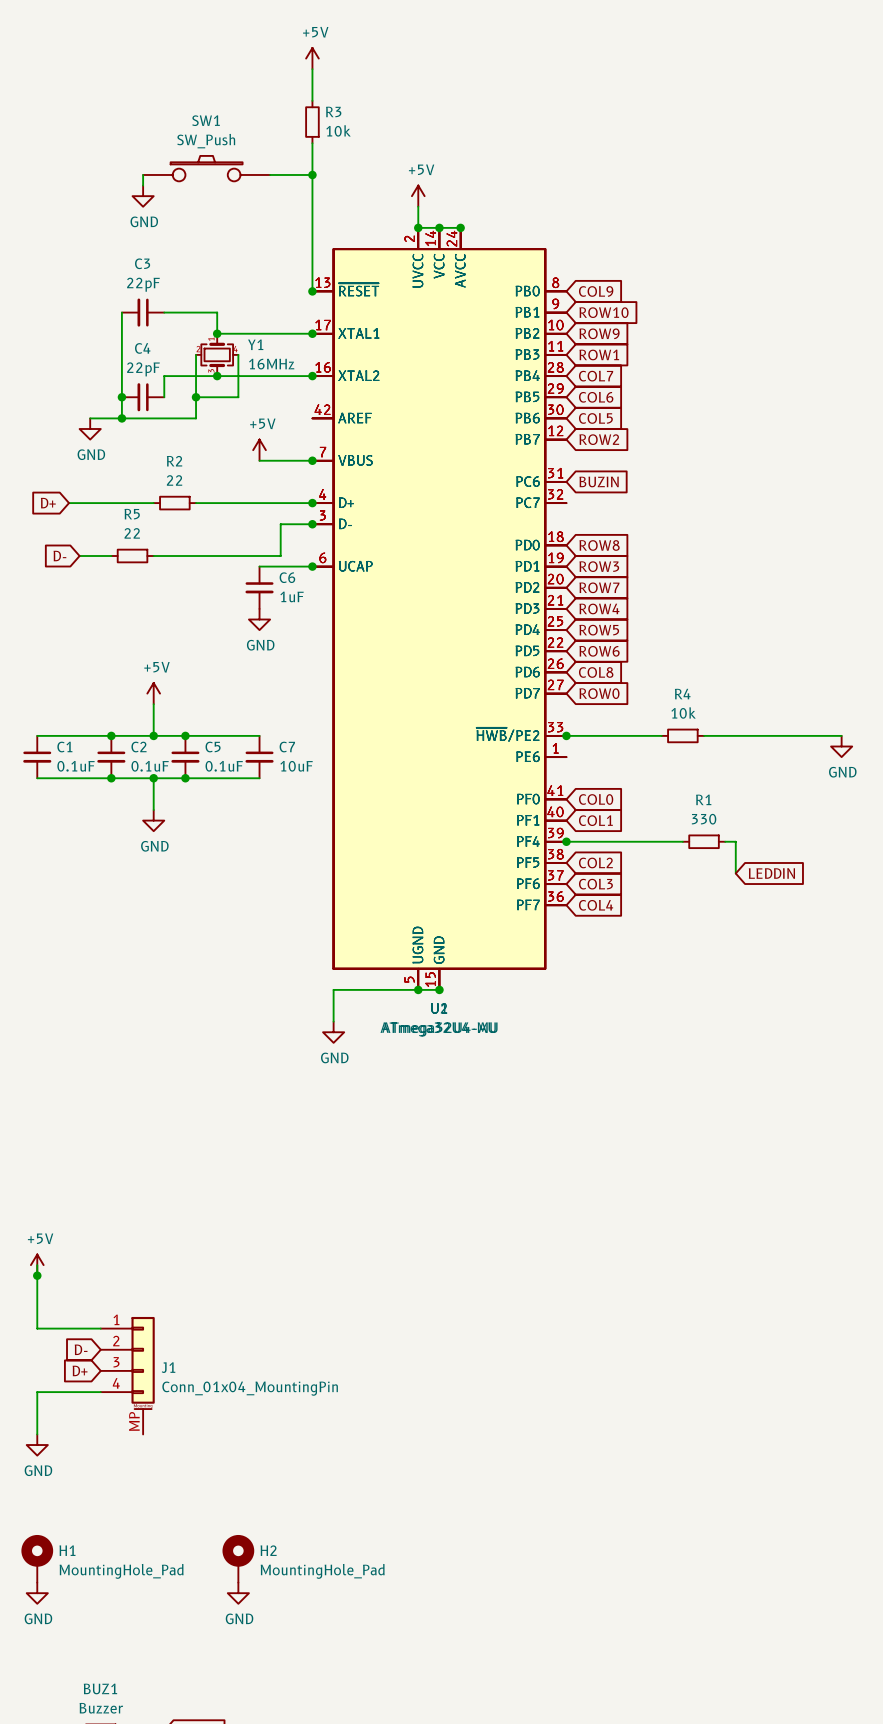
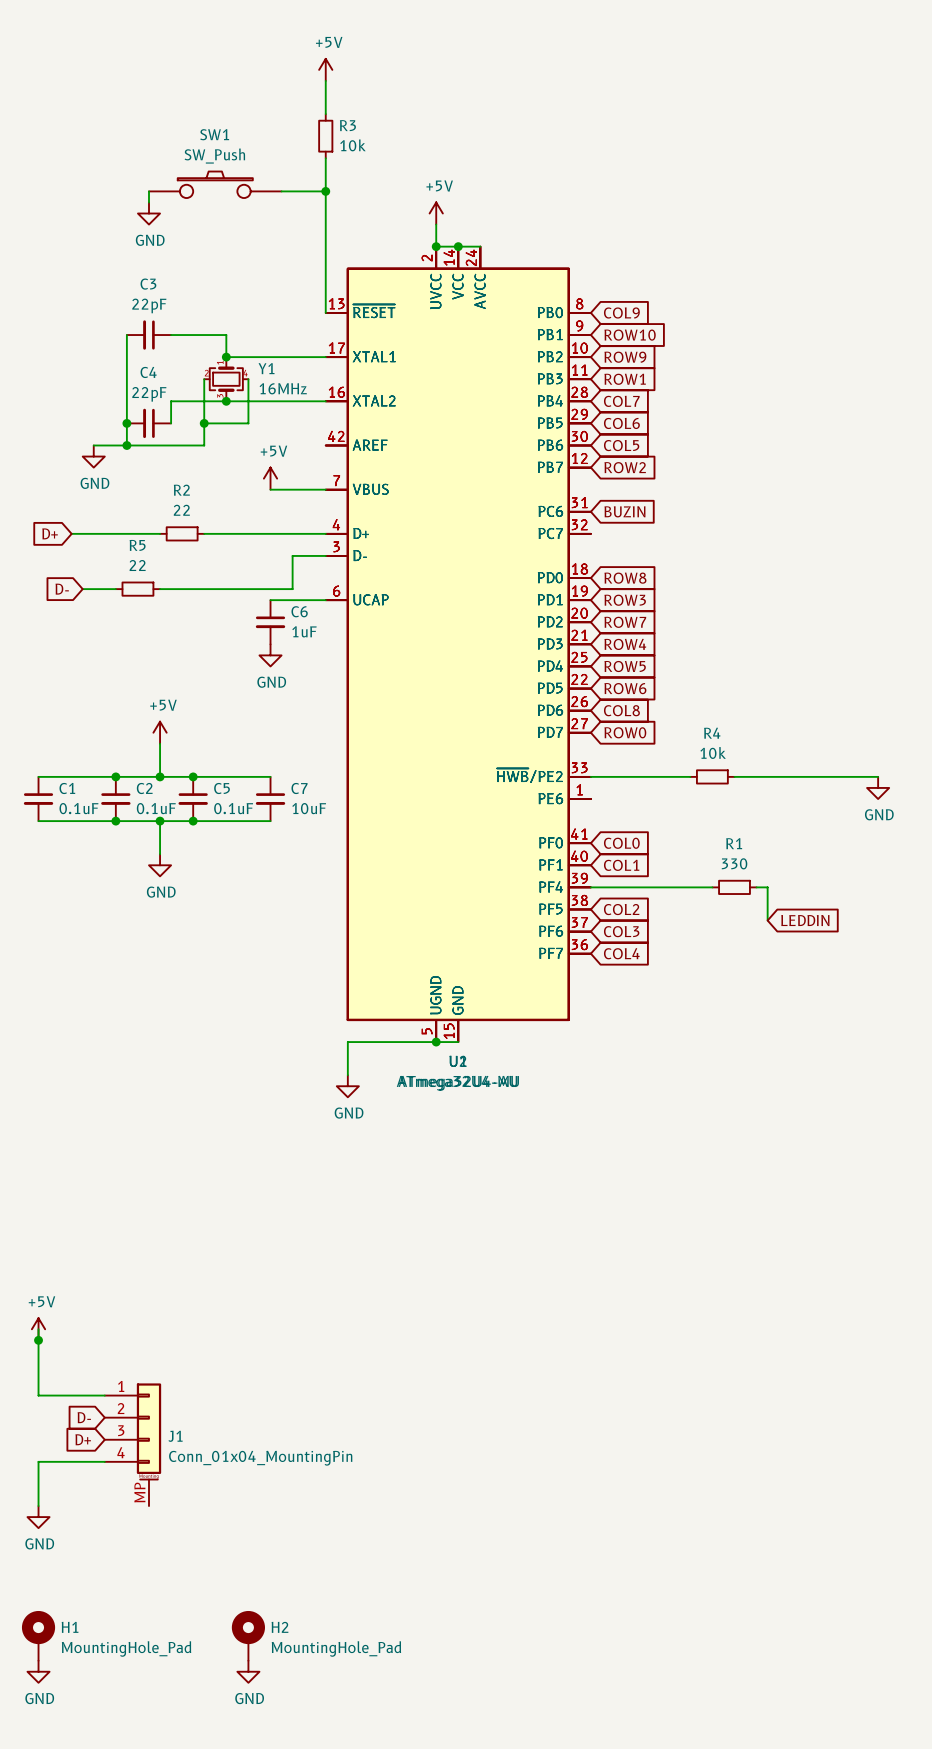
junction: (460, 227) -> none
junction: (312, 291) -> none
junction: (312, 333) -> none
junction: (312, 376) -> none
junction: (312, 460) -> none
junction: (312, 503) -> none
junction: (312, 524) -> none
junction: (312, 566) -> none
junction: (566, 735) -> none
junction: (566, 841) -> none
junction: (439, 989) -> none

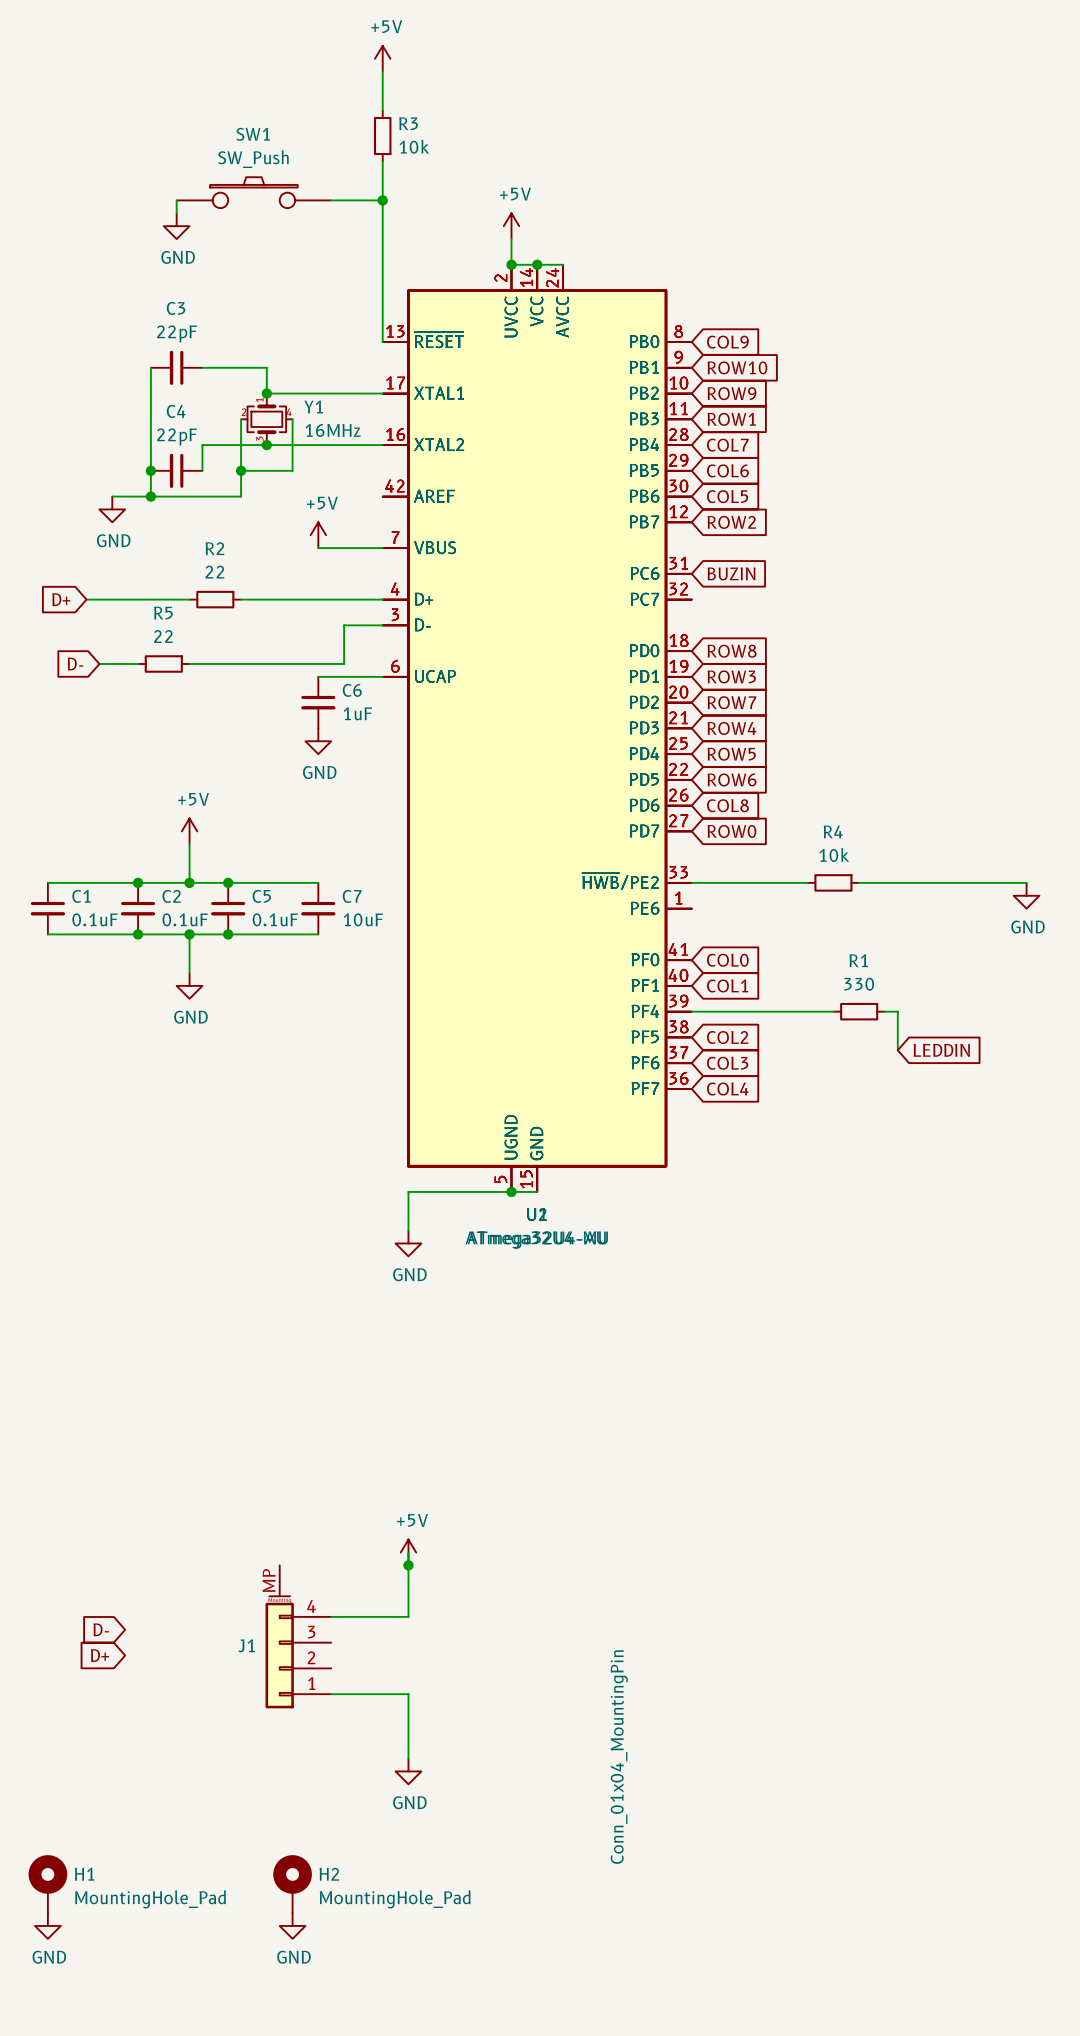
wire: (38, 1329) (38, 1395) (104, 1395) -> none
power symbol: +5V (38, 1329) -> none
junction: (38, 1340) -> none
wire: none -> (408, 1552) (408, 1616) (331, 1616)
power symbol: none -> +5V (408, 1552)
junction: none -> (408, 1565)
J1 rotation: 0° (148, 1431) -> 180° (279, 1651)
J1 position: (132, 1444) -> (298, 1636)
J1 value position: Conn_01x04_MountingPin (260, 1458) -> Conn_01x04_MountingPin (619, 1757)
wire: (104, 1461) (38, 1461) (38, 1506) -> none
wire: none -> (331, 1694) (408, 1694) (408, 1758)
power symbol: GND (38, 1517) -> none
power symbol: none -> GND (408, 1771)

